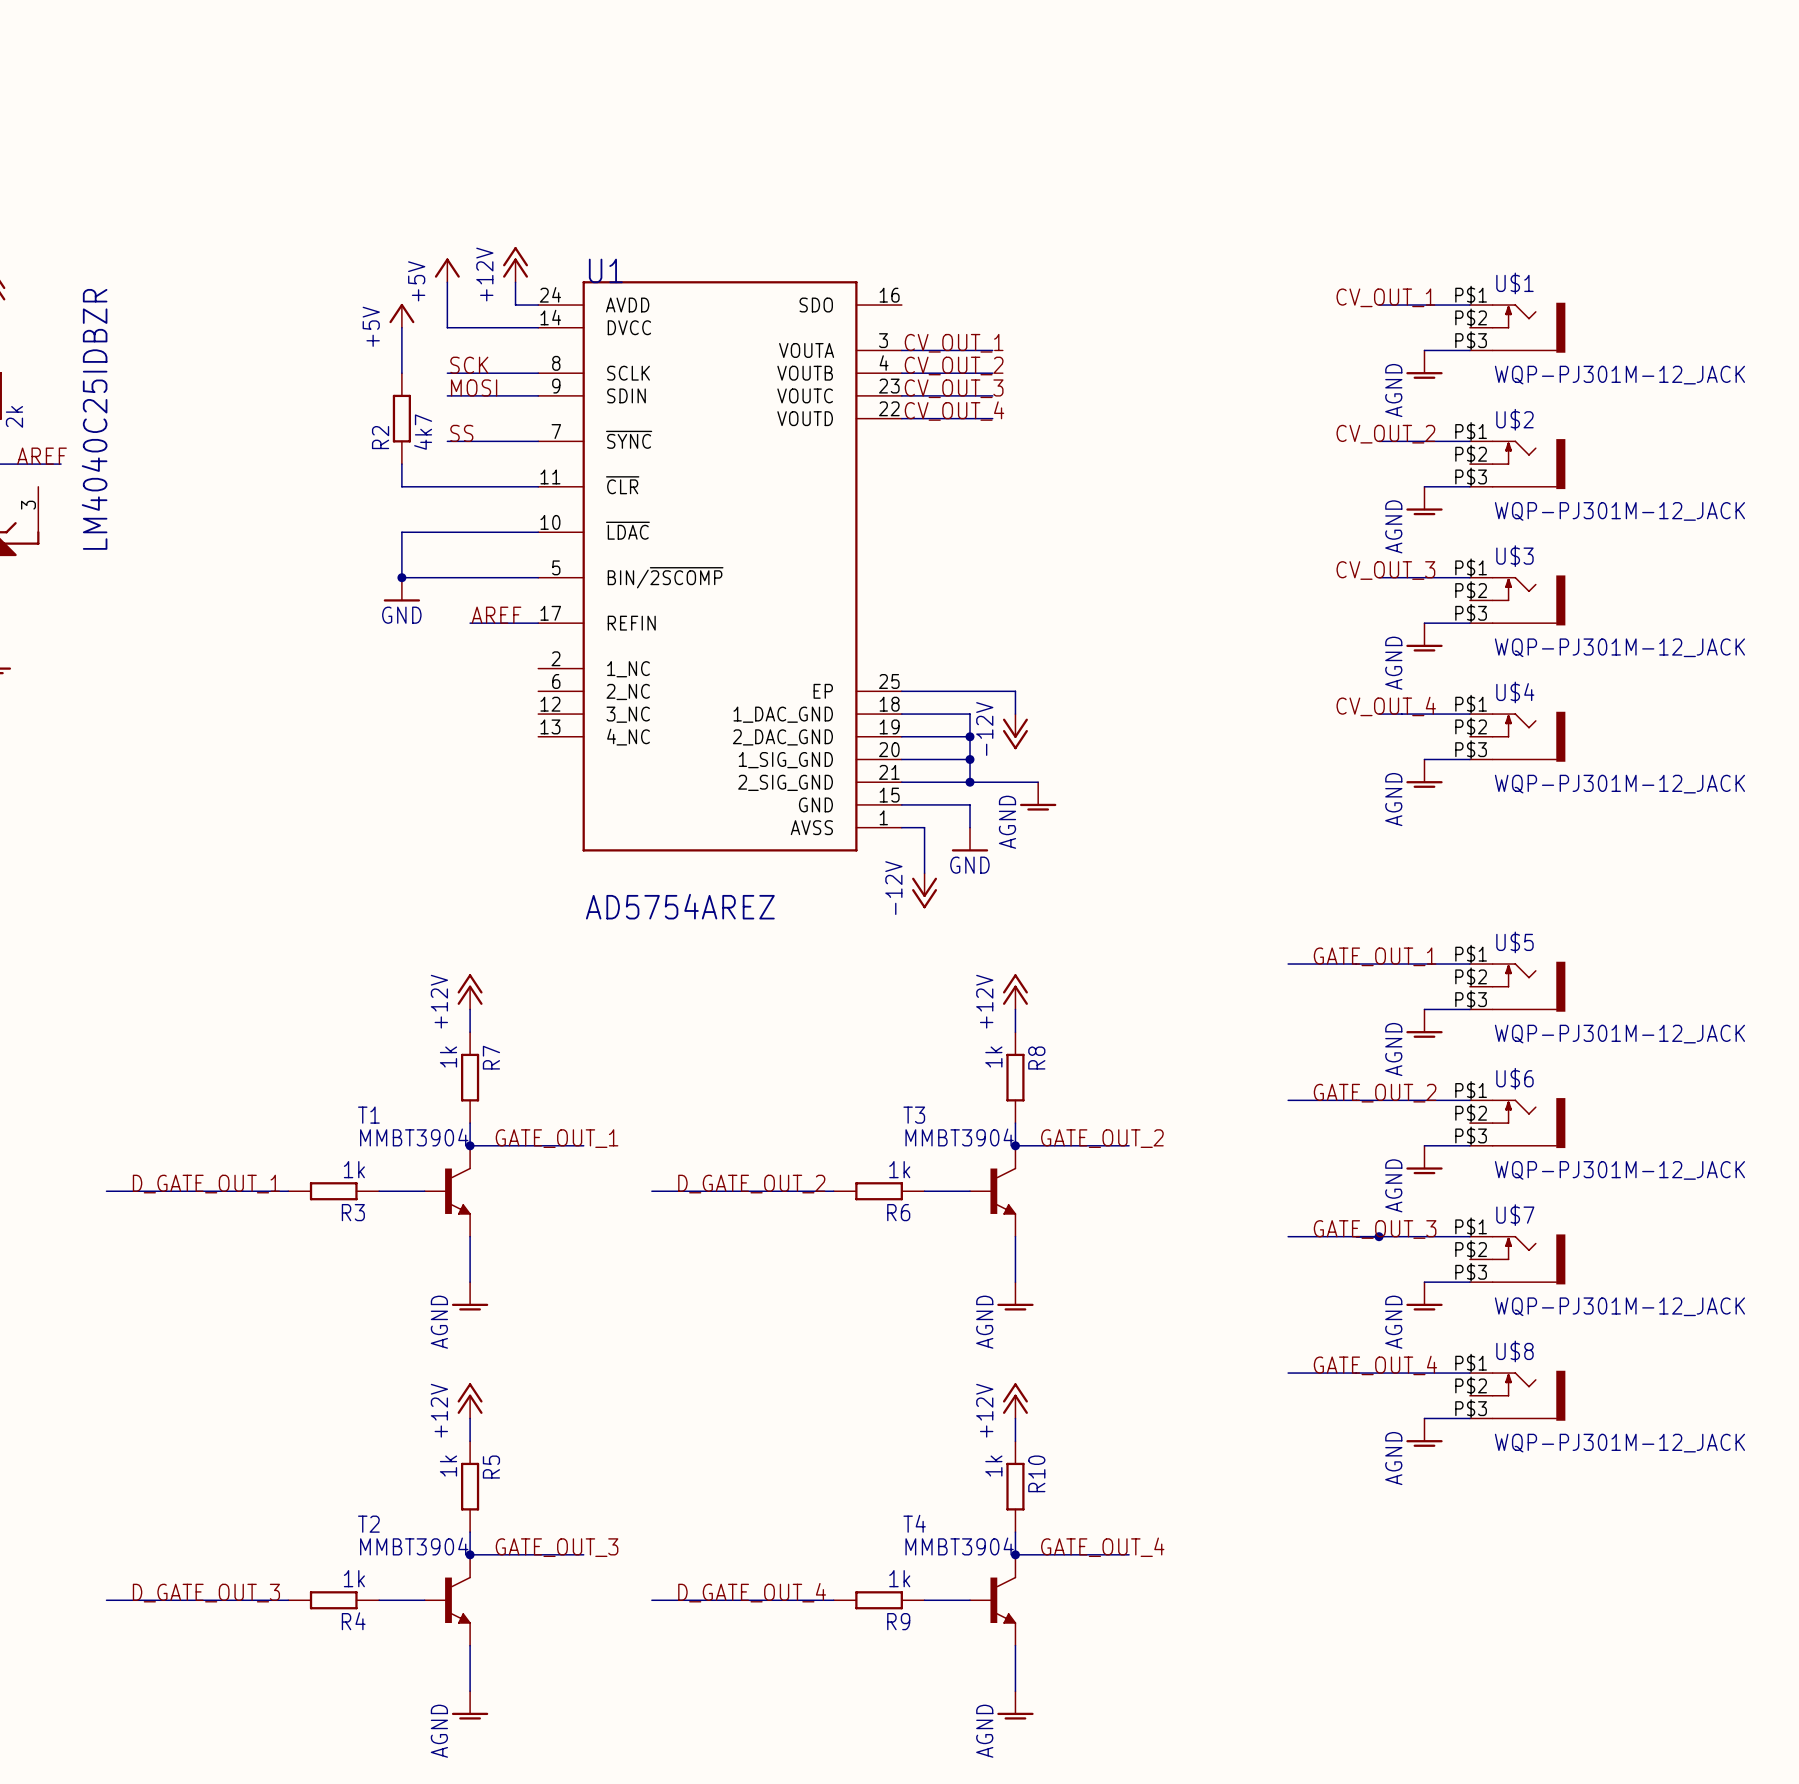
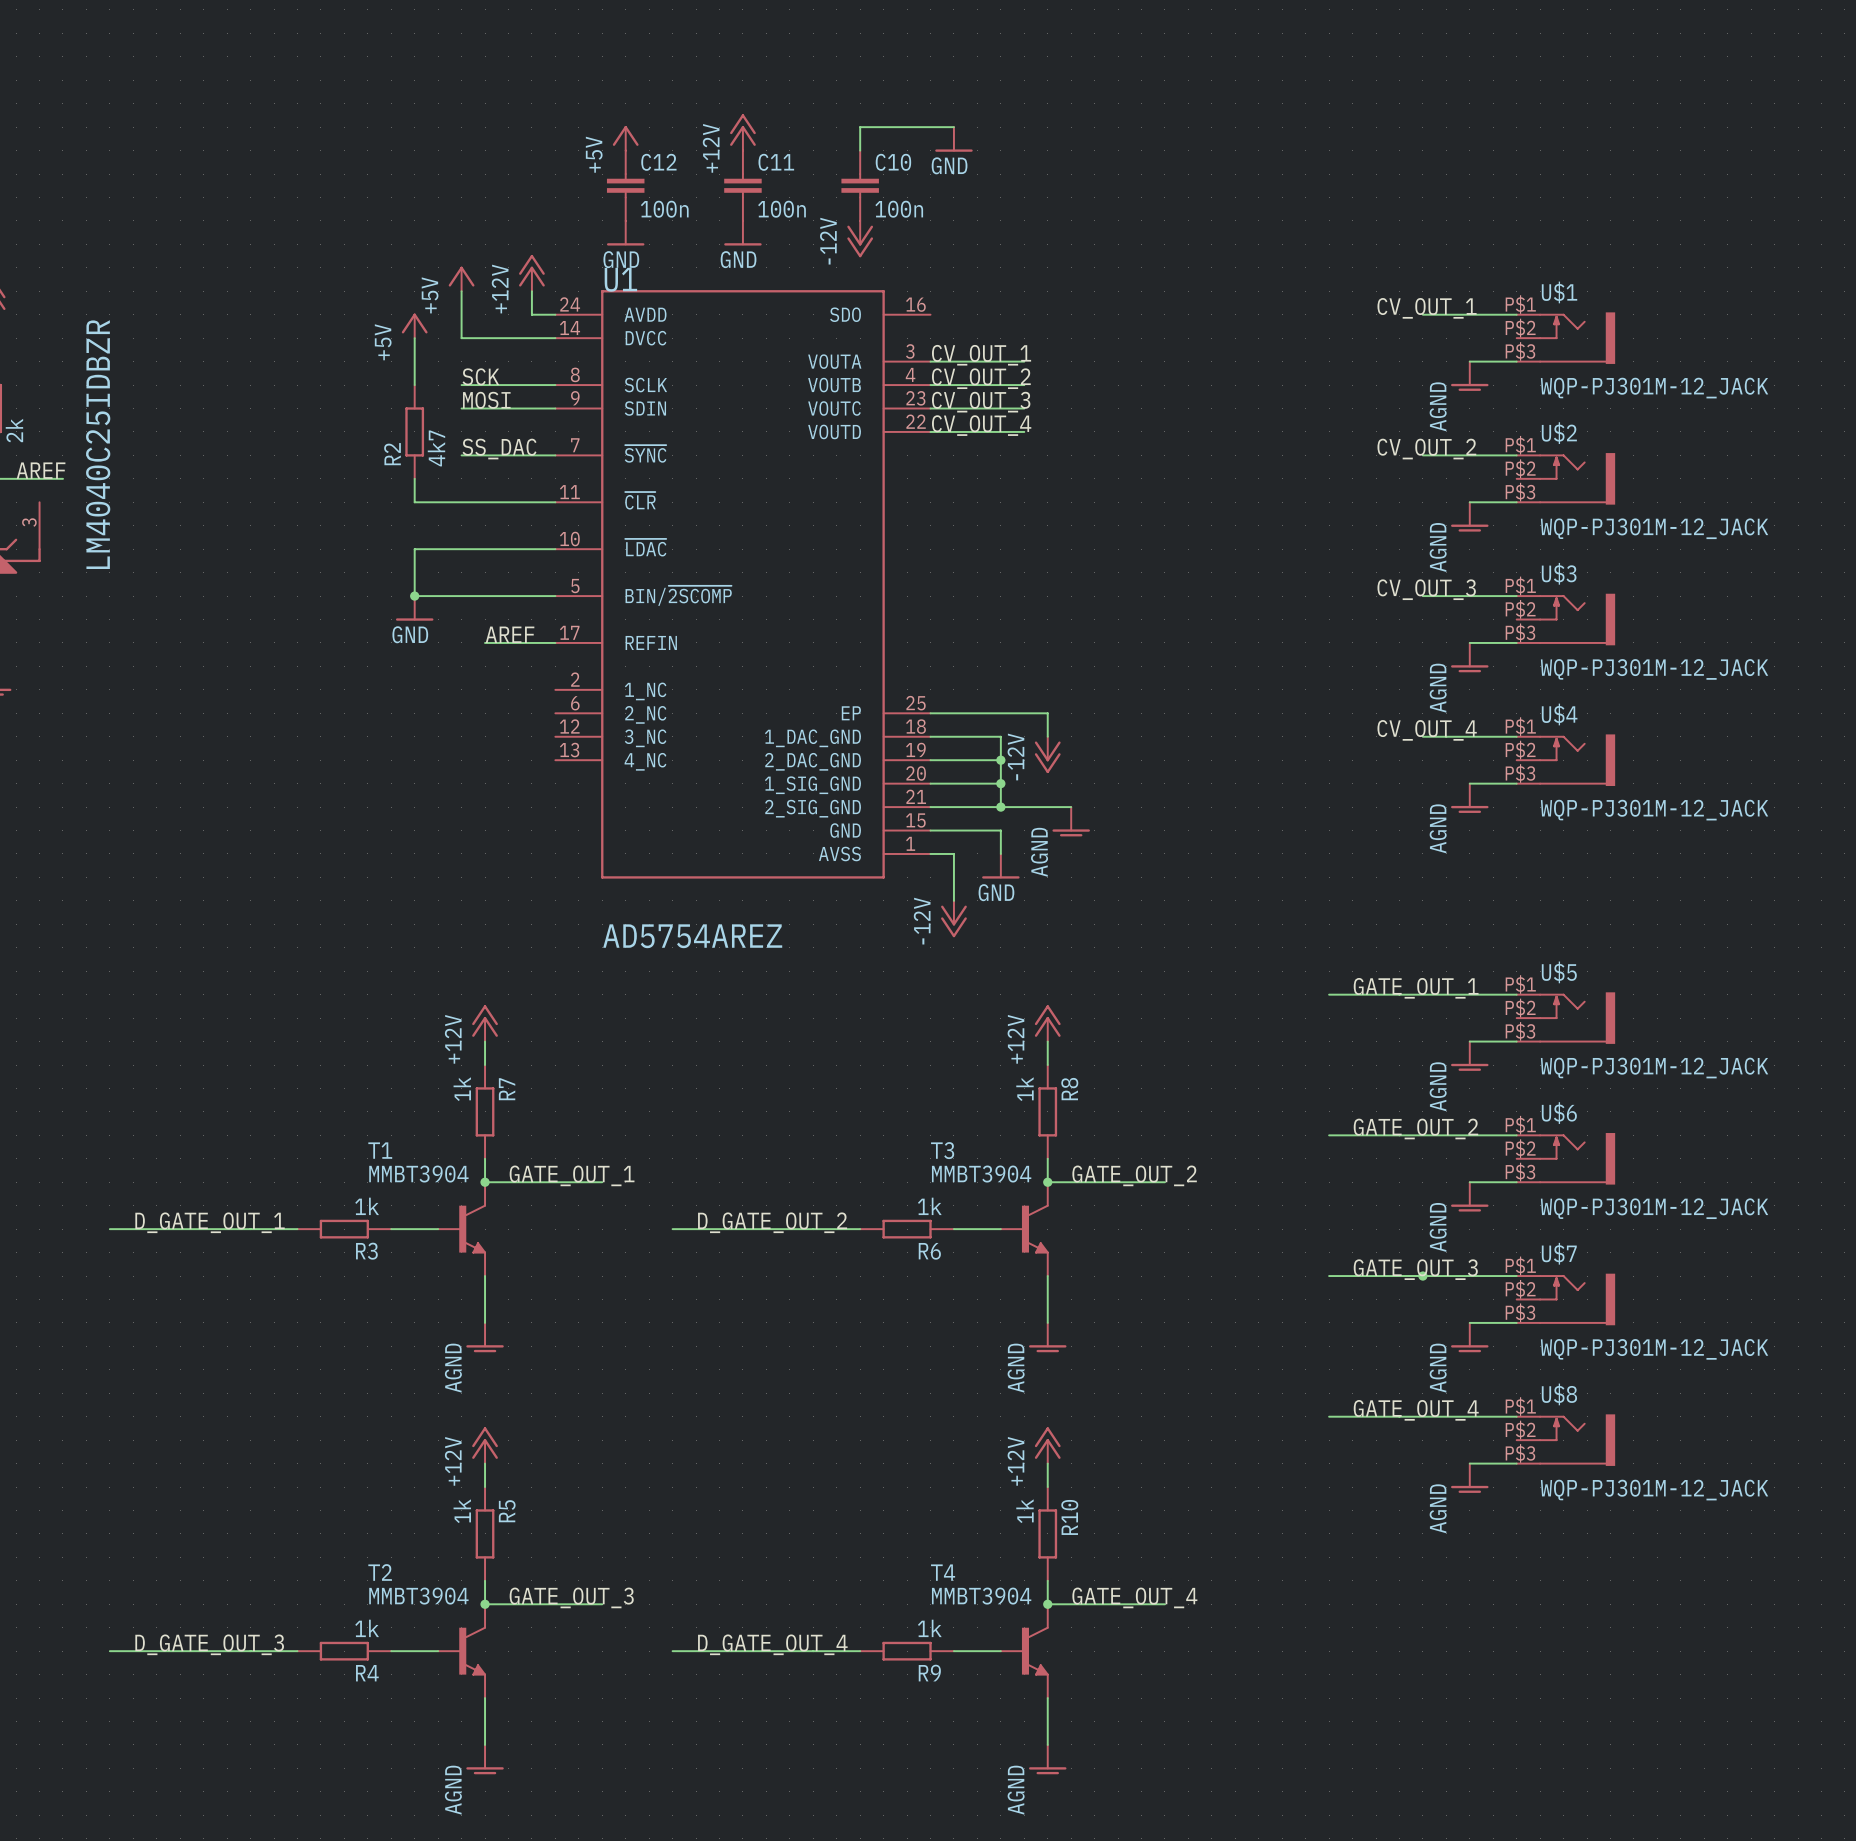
wire: none -> (953, 127) (860, 127) (860, 150)
power symbol: none -> +12V (742, 132)
power symbol: none -> +5V (625, 138)
power symbol: none -> GND (953, 139)
C12: none -> 100n (625, 185)
C11: none -> 100n (742, 185)
C10: none -> 100n (860, 185)
power symbol: none -> GND (625, 233)
power symbol: none -> GND (742, 233)
power symbol: none -> -12V (860, 239)
label: SS (461, 433) -> SS_DAC (499, 449)

